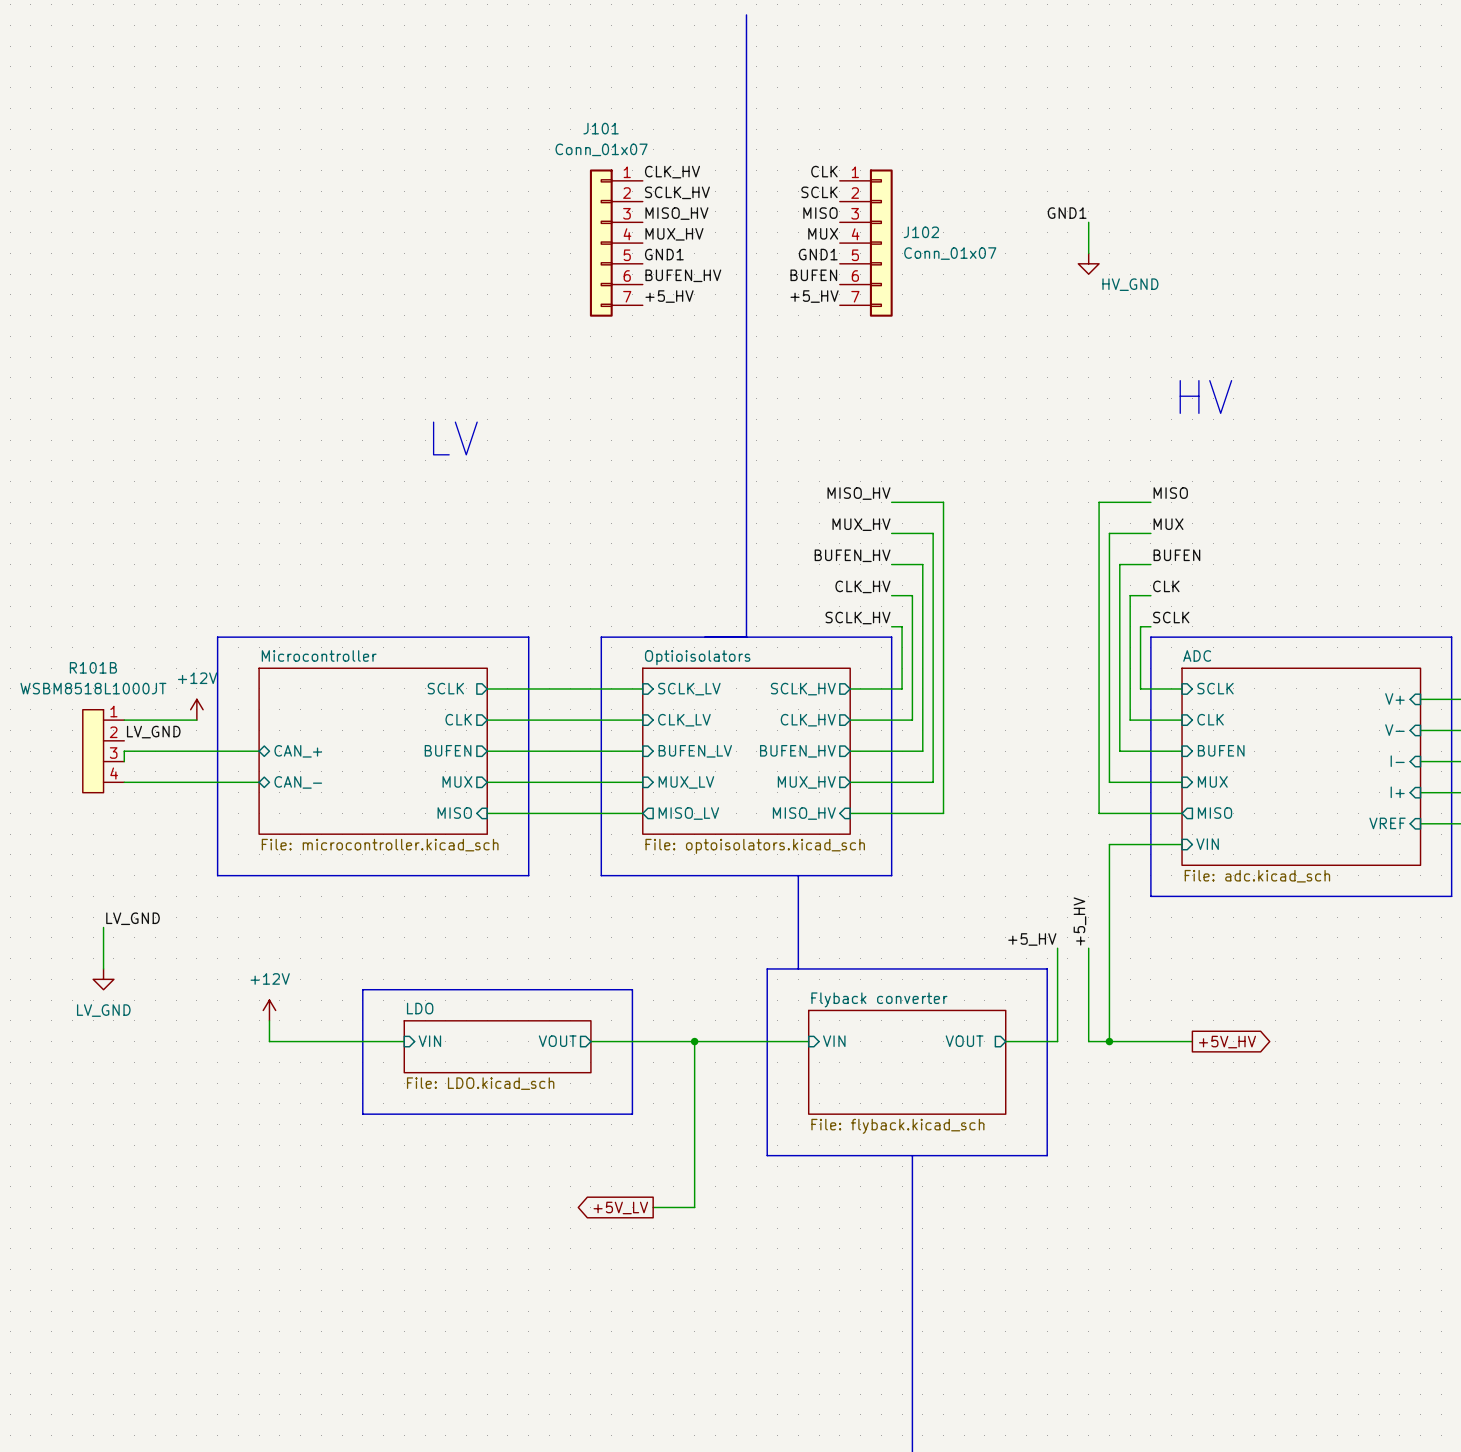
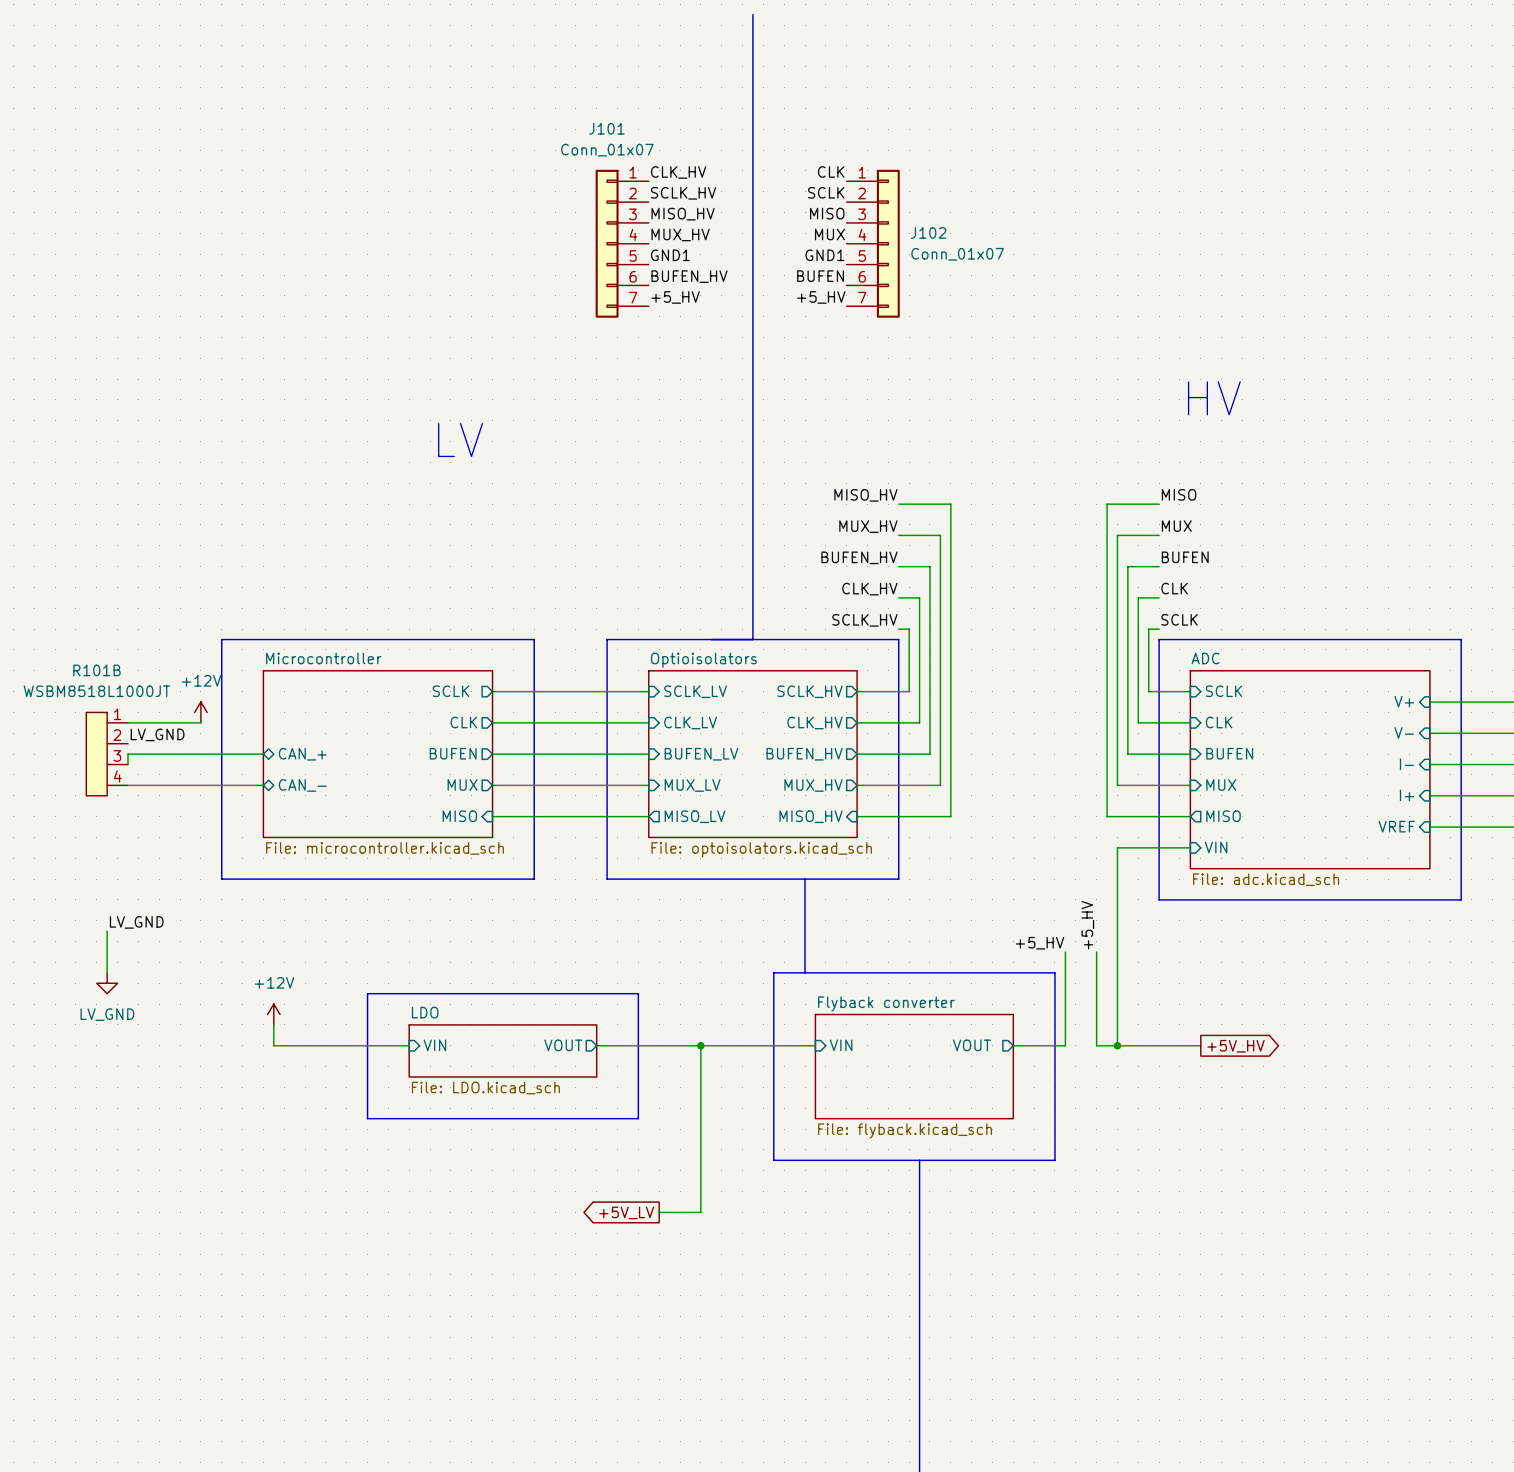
label: GND1 (1067, 213) -> none
wire: (1088, 222) (1088, 253) -> none
power symbol: HV_GND (1088, 263) -> none

